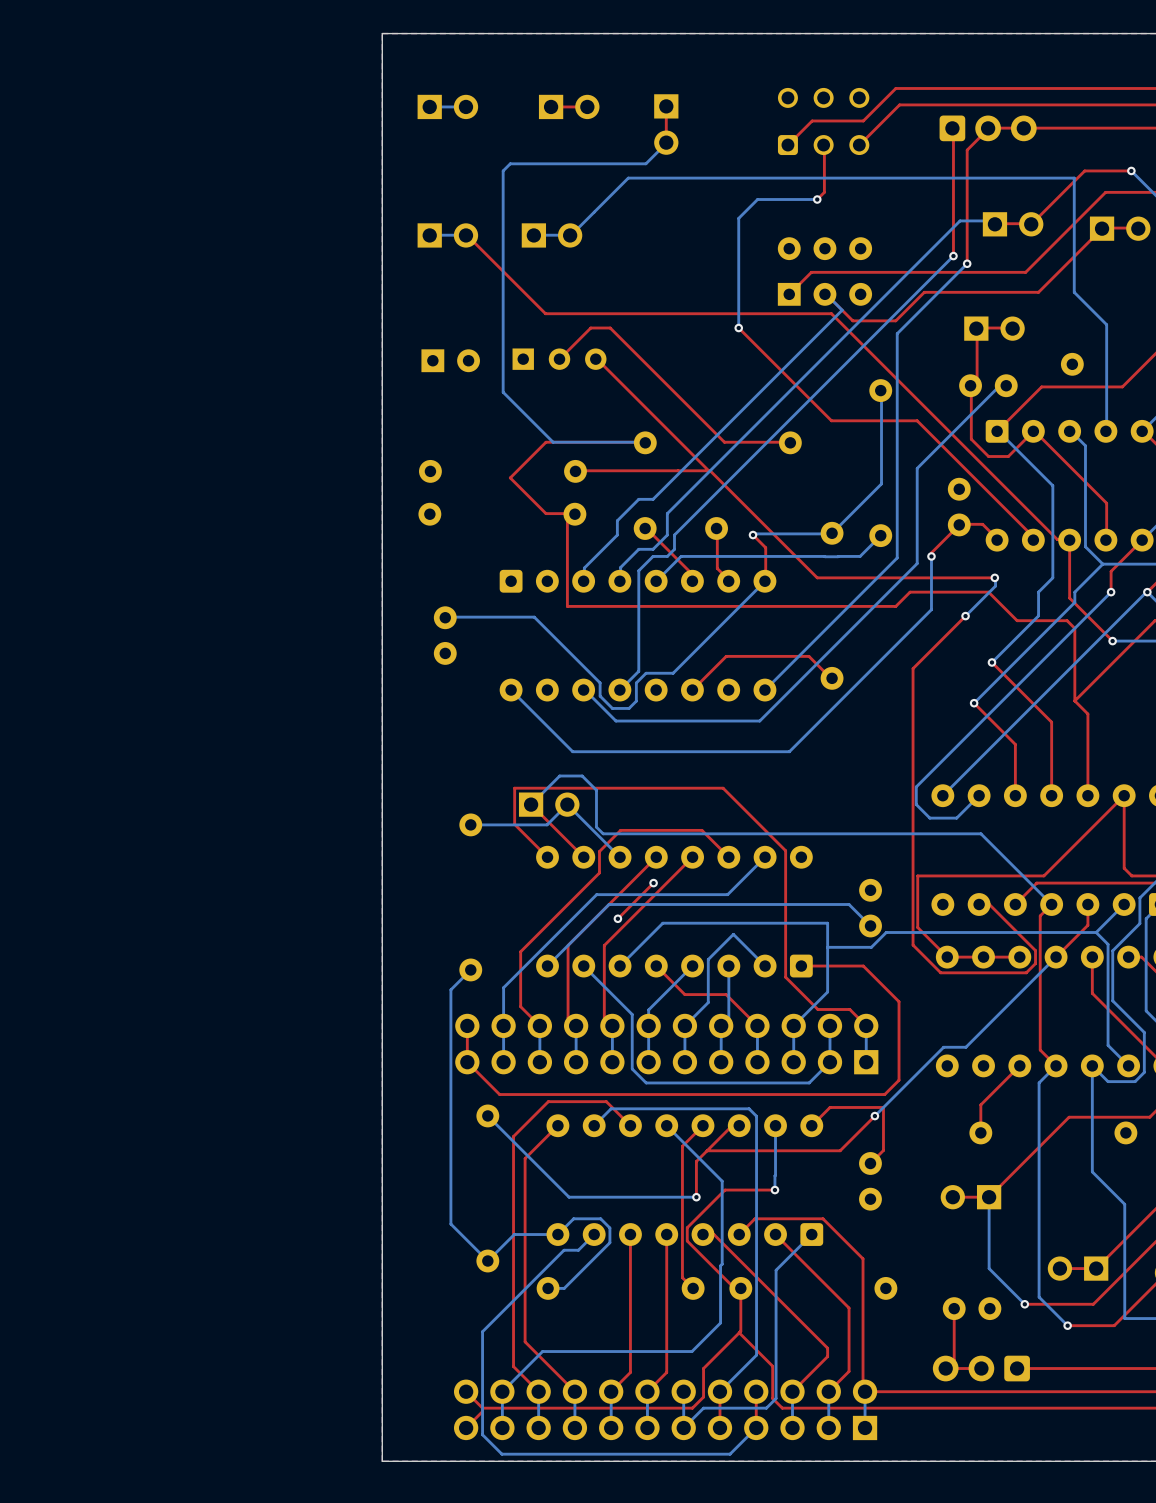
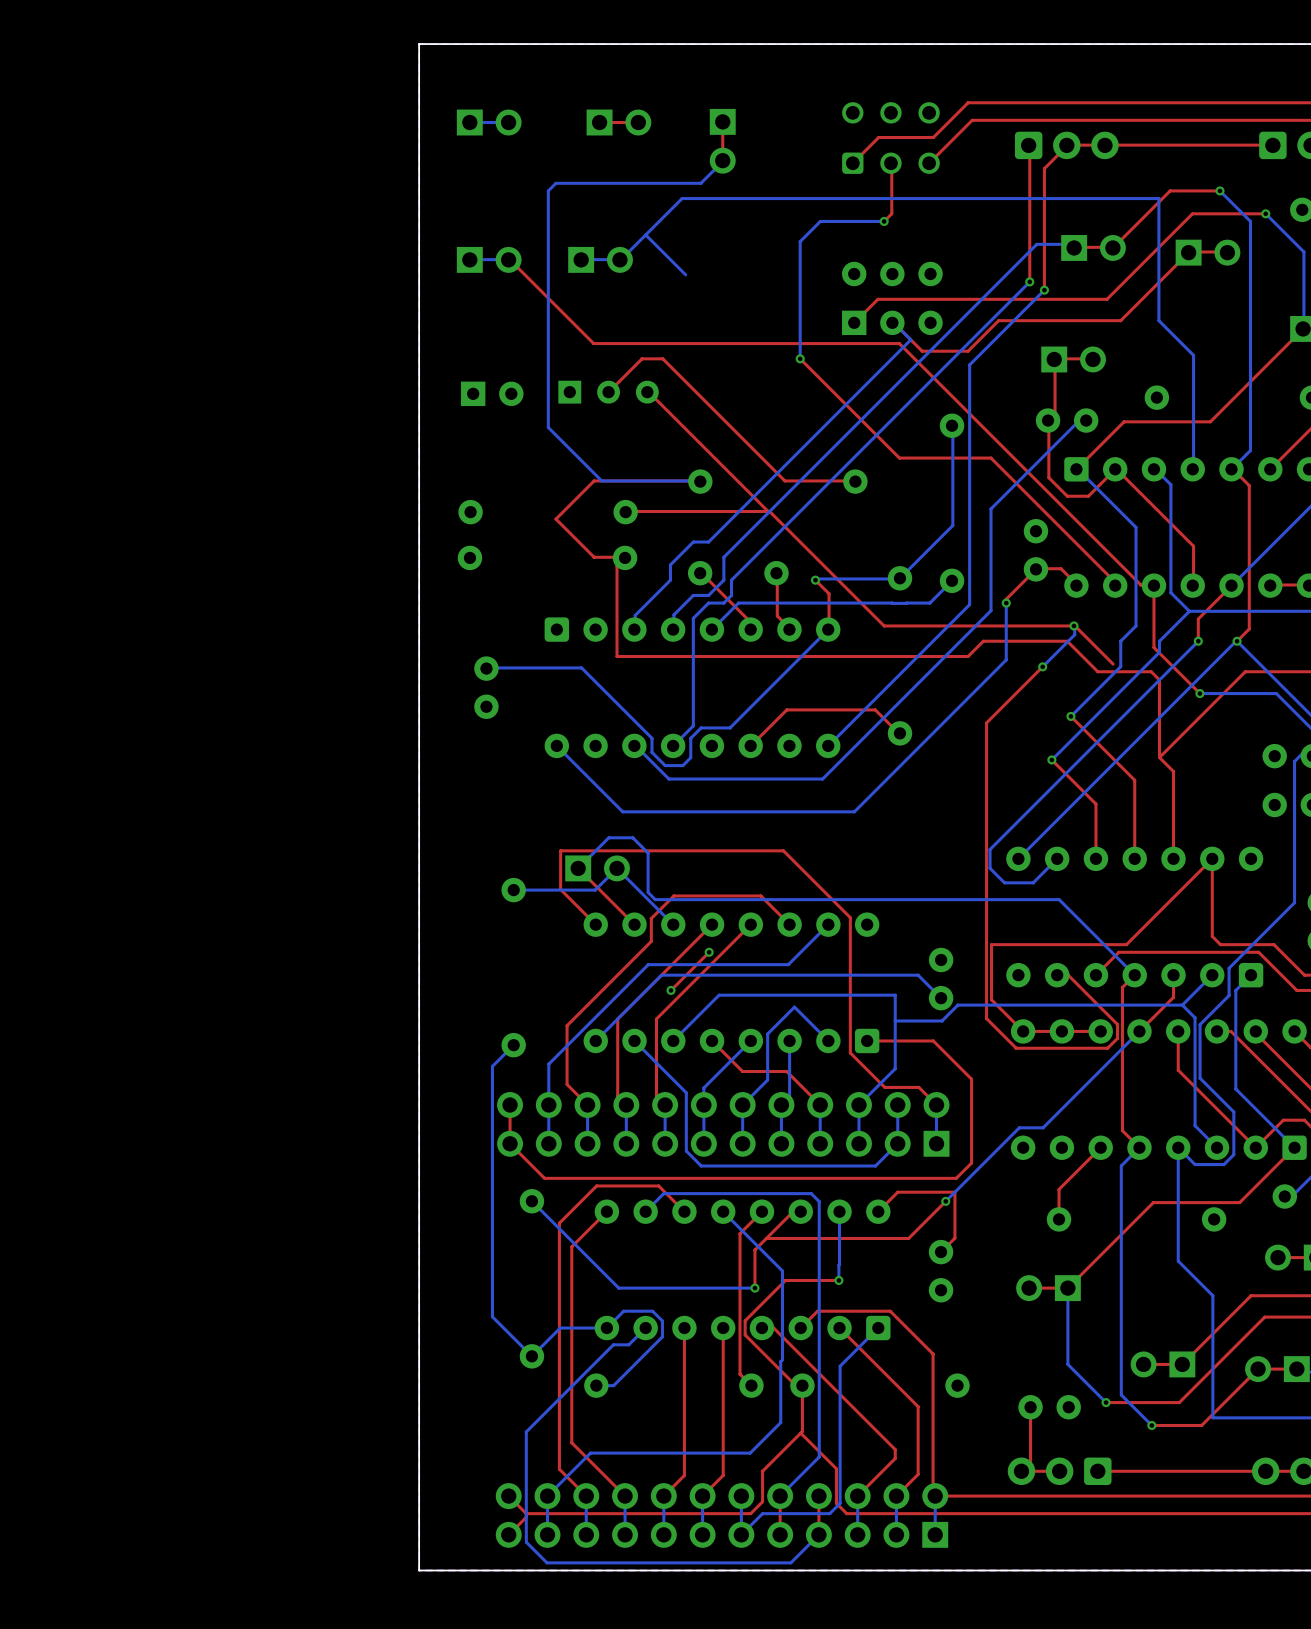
bottom track: none -> (645, 234) (685, 274)
top track: none -> (1074, 625) (1113, 664)

